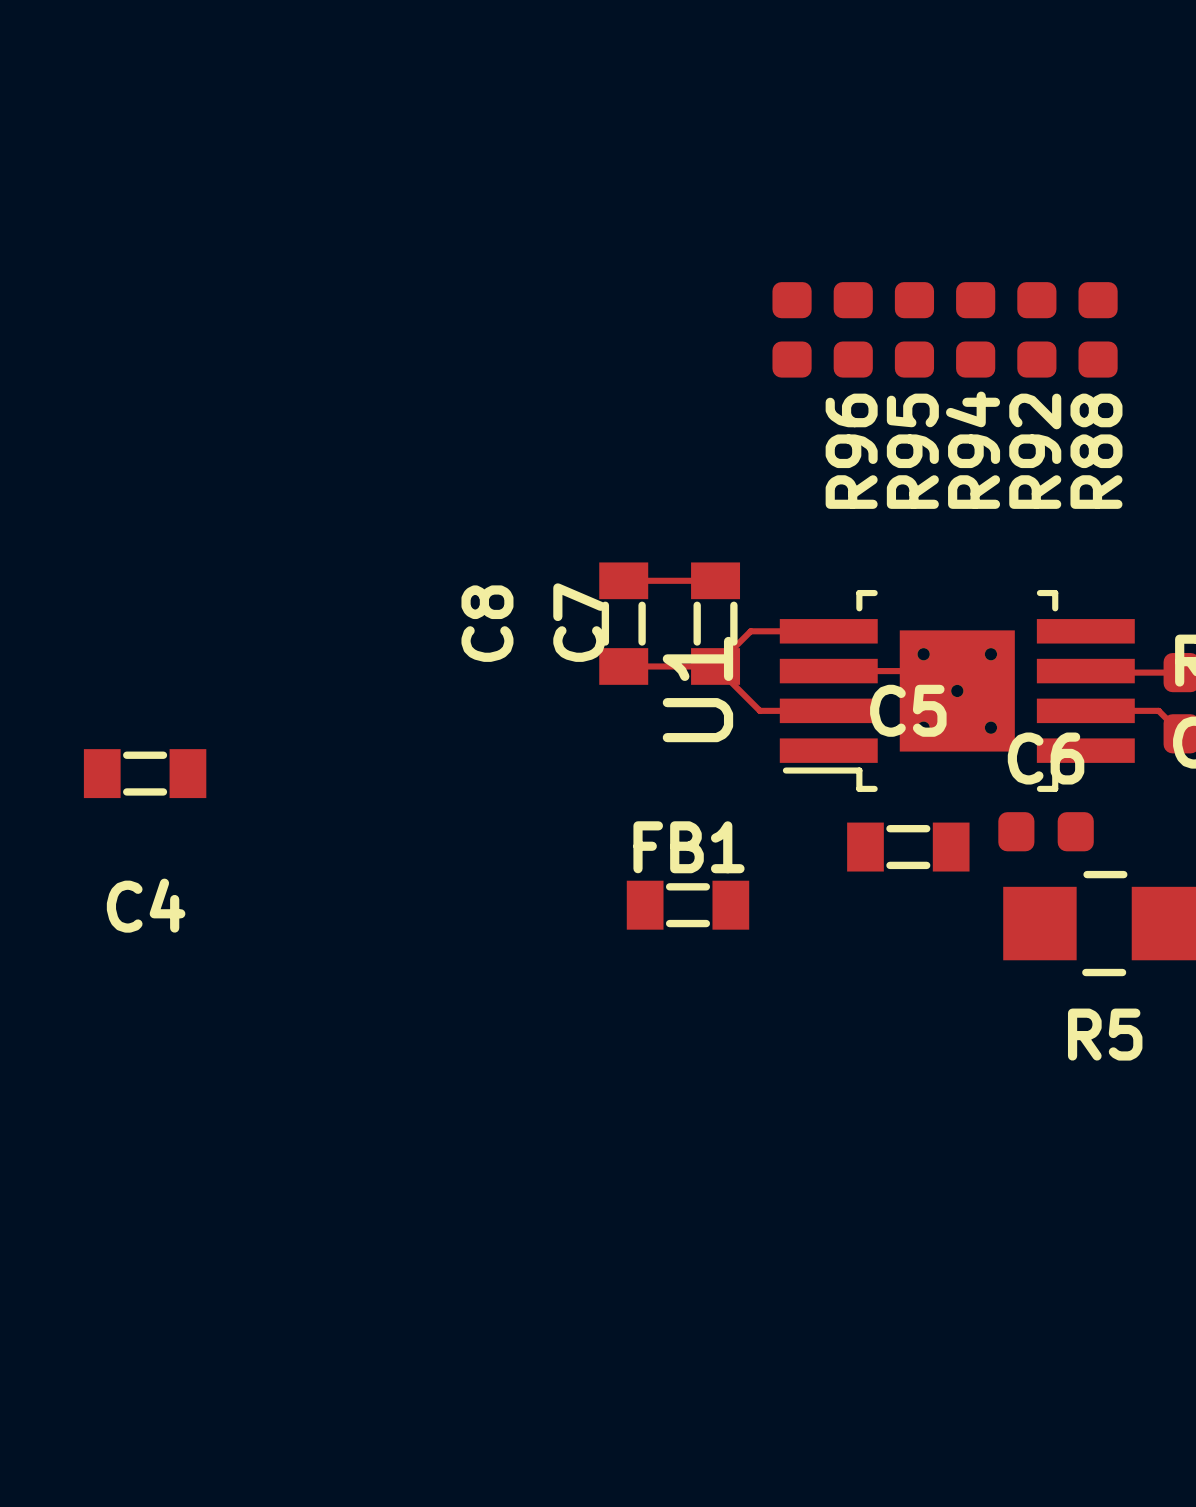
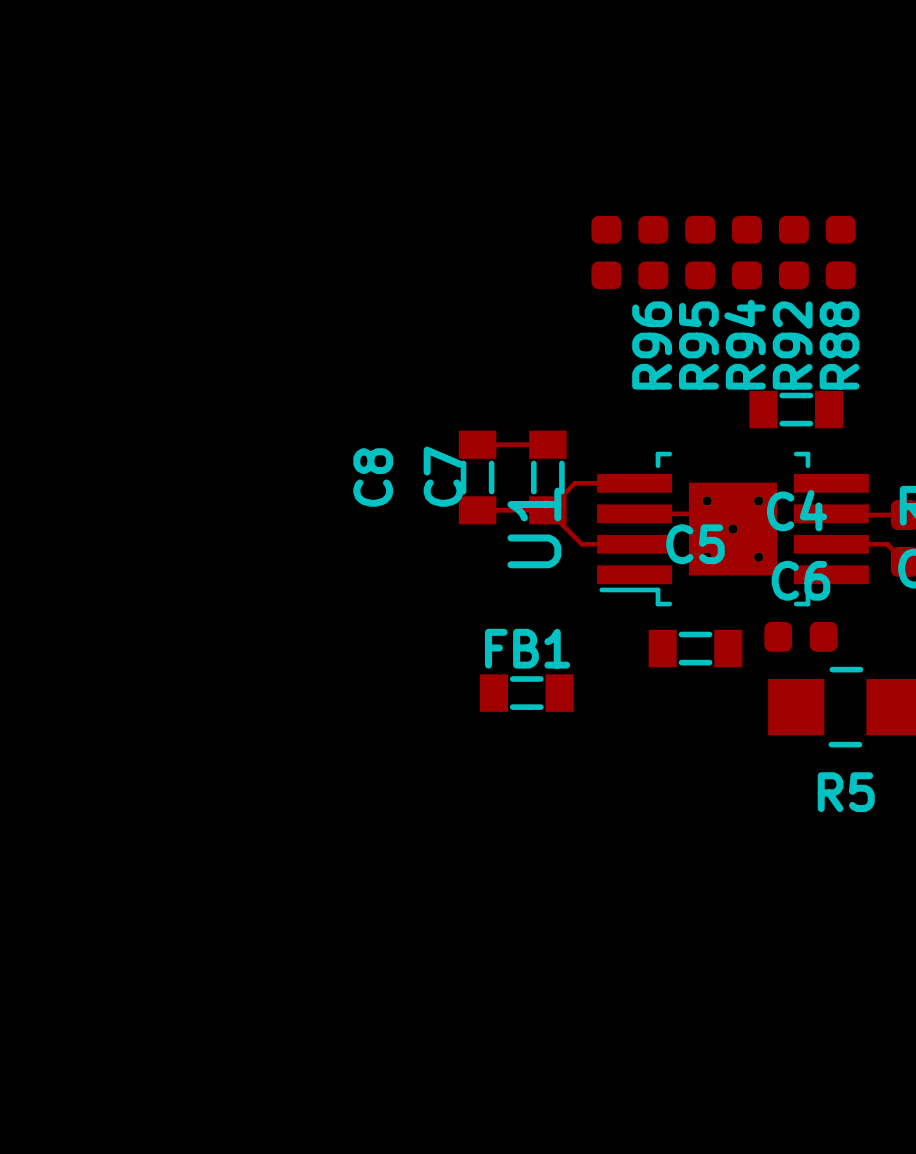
C4 position: (145, 773) -> (796, 409)

